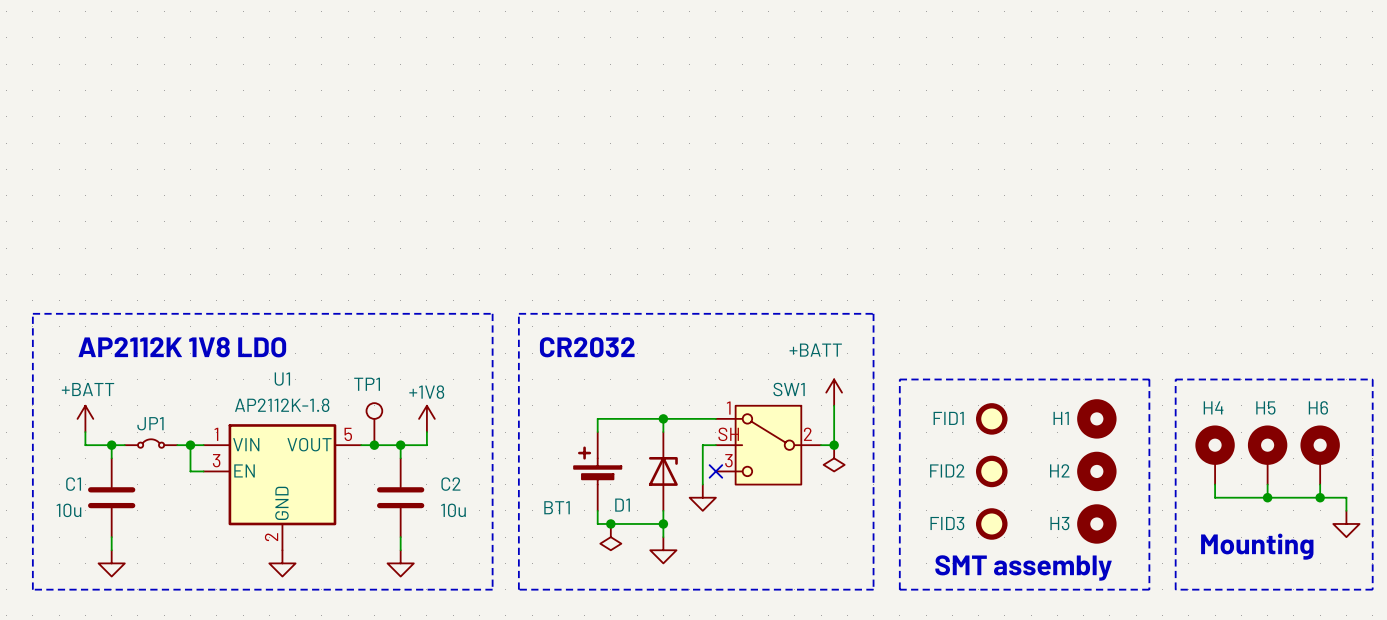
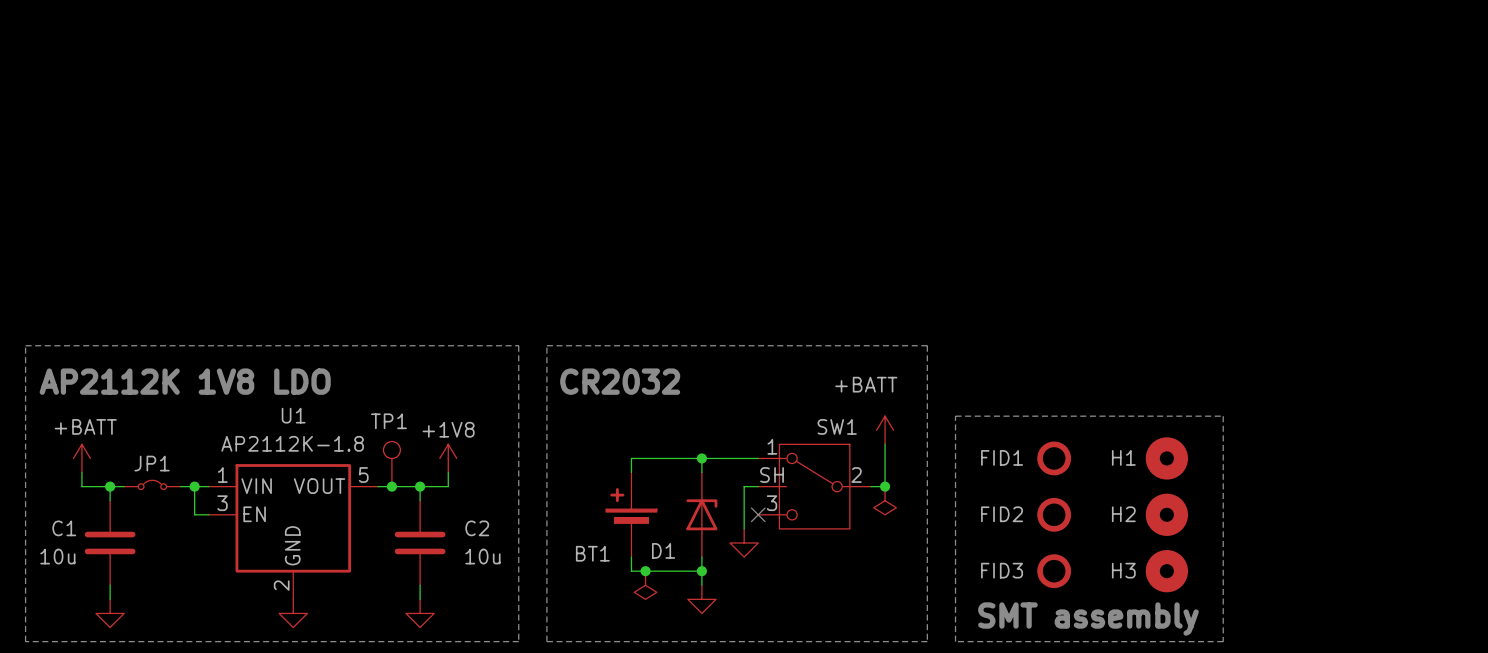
line: (1175, 379) (1372, 379) (1372, 589) (1175, 589) (1175, 379) -> none
H4: (1215, 455) -> none
H5: (1267, 455) -> none
H6: (1320, 455) -> none
wire: (1215, 484) (1215, 497) (1346, 497) (1346, 510) -> none
wire: (1267, 484) (1267, 497) -> none
wire: (1320, 484) (1320, 497) -> none
junction: (1267, 497) -> none
junction: (1320, 497) -> none
power symbol: (1346, 523) -> none
text: Mounting (1257, 546) -> none

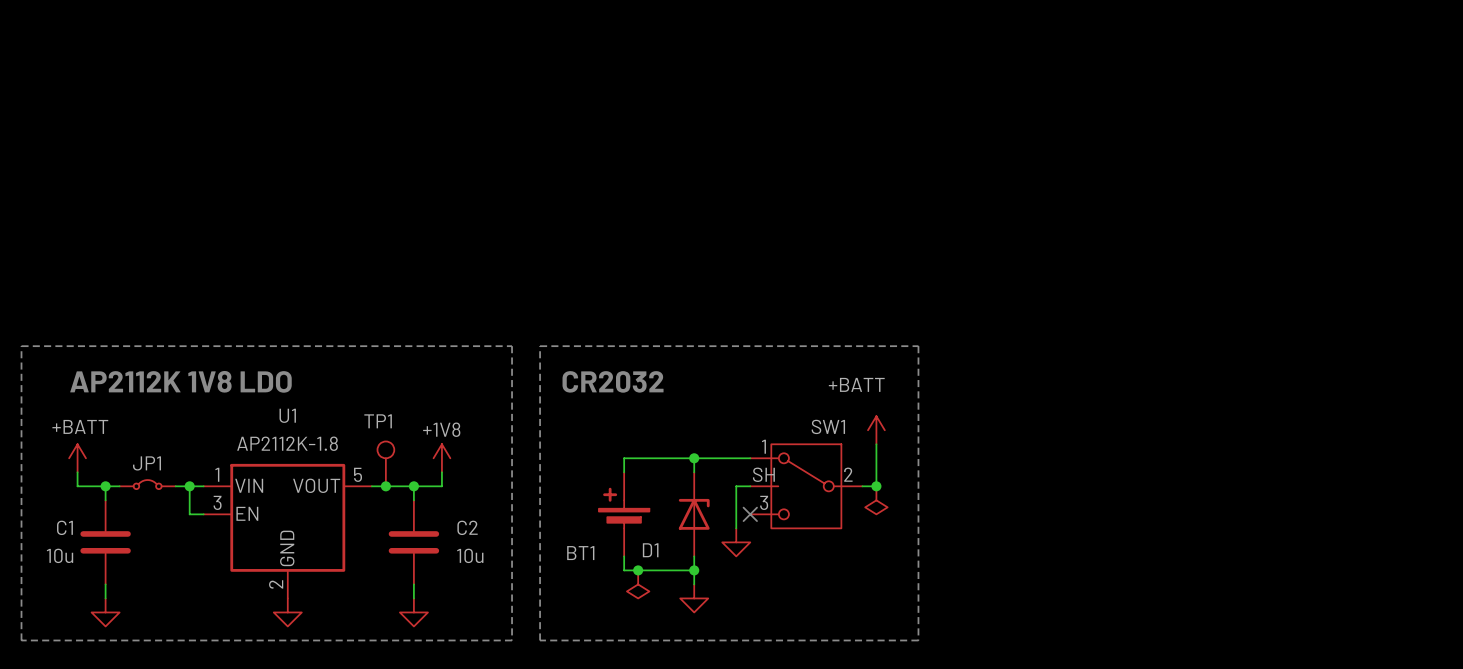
line: (955, 416) (1223, 416) (1223, 641) (955, 641) (955, 416) -> none
FID1: (1054, 458) -> none
H1: (1166, 458) -> none
FID2: (1054, 514) -> none
H2: (1166, 514) -> none
FID3: (1054, 571) -> none
H3: (1166, 571) -> none
text: SMT assembly (1088, 619) -> none

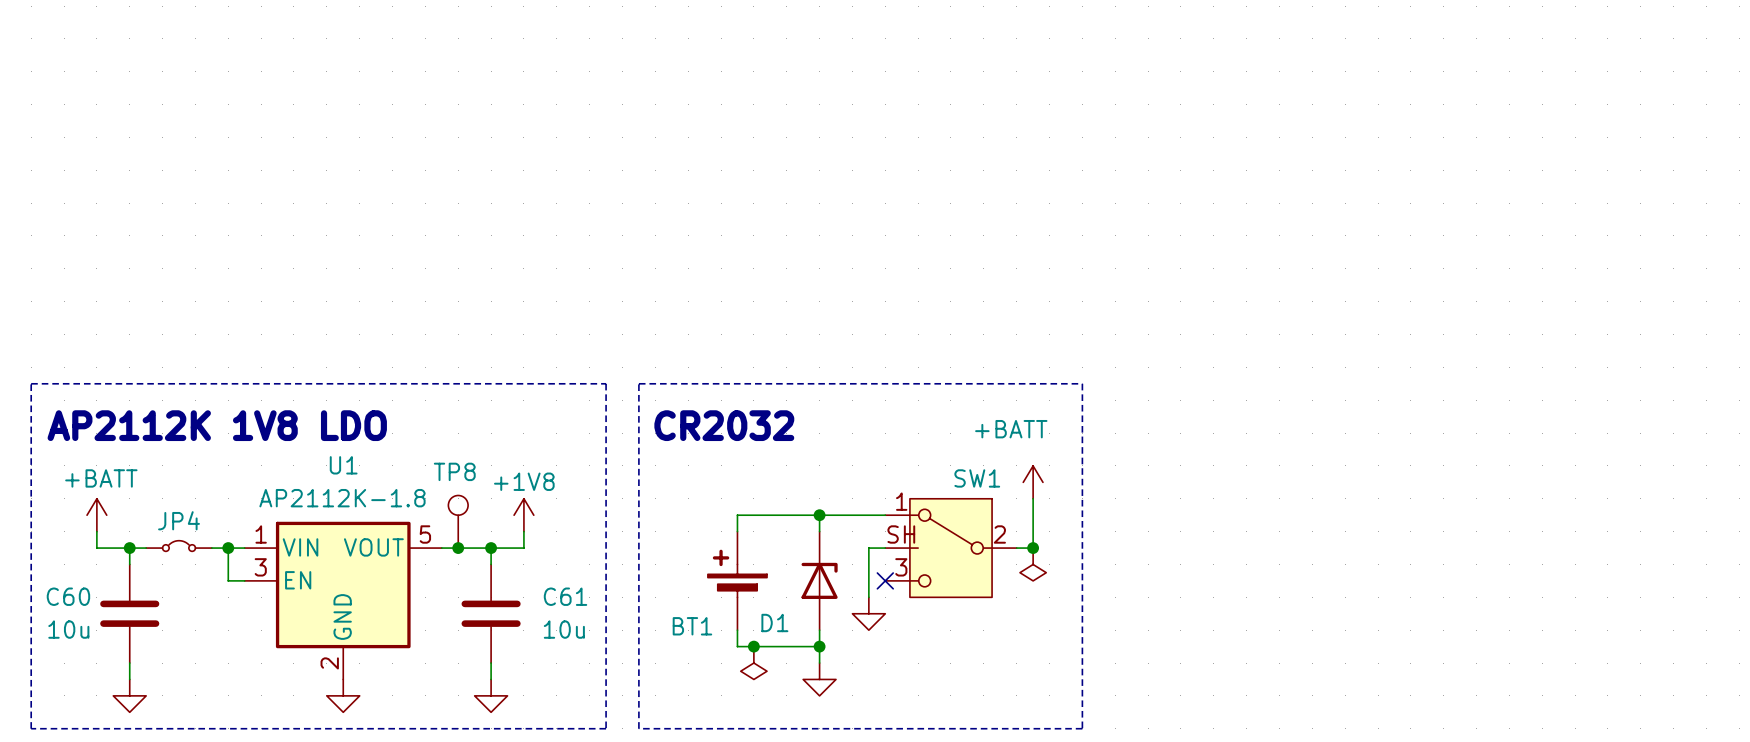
TP1 name: TP1 (378, 421) -> TP8 (454, 471)
JP1 name: JP1 (147, 463) -> JP4 (179, 520)
C1 name: C1 (64, 527) -> C60 (68, 596)
C2 name: C2 (467, 527) -> C61 (565, 596)

